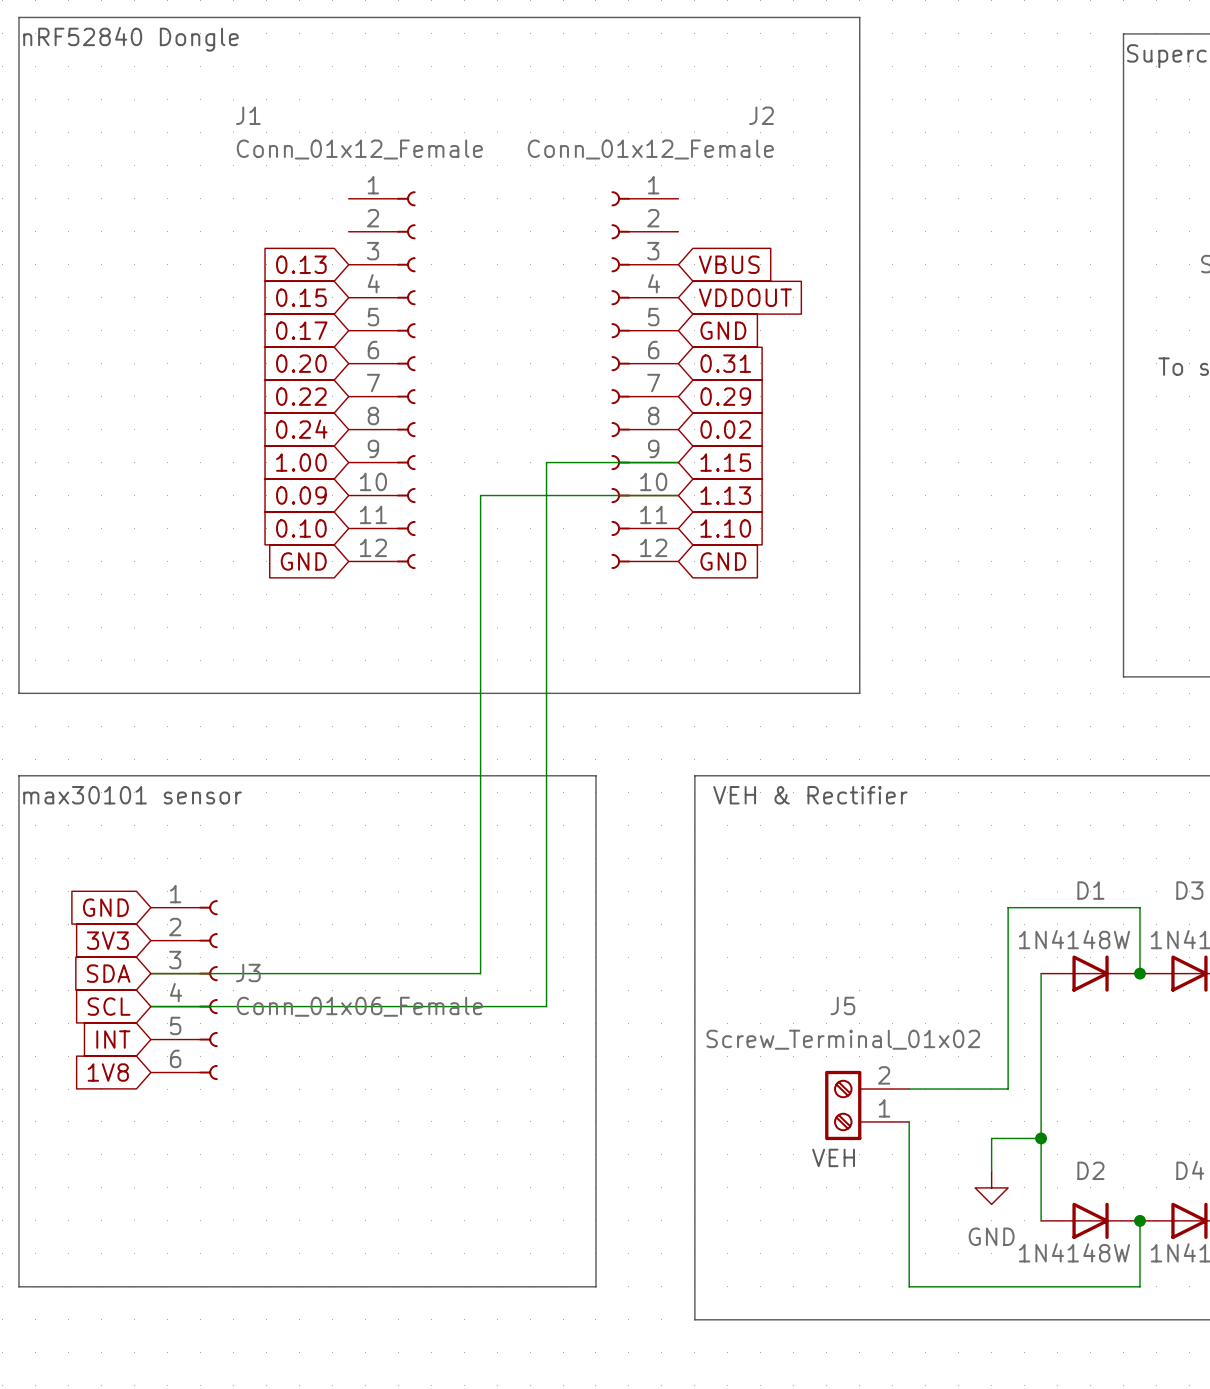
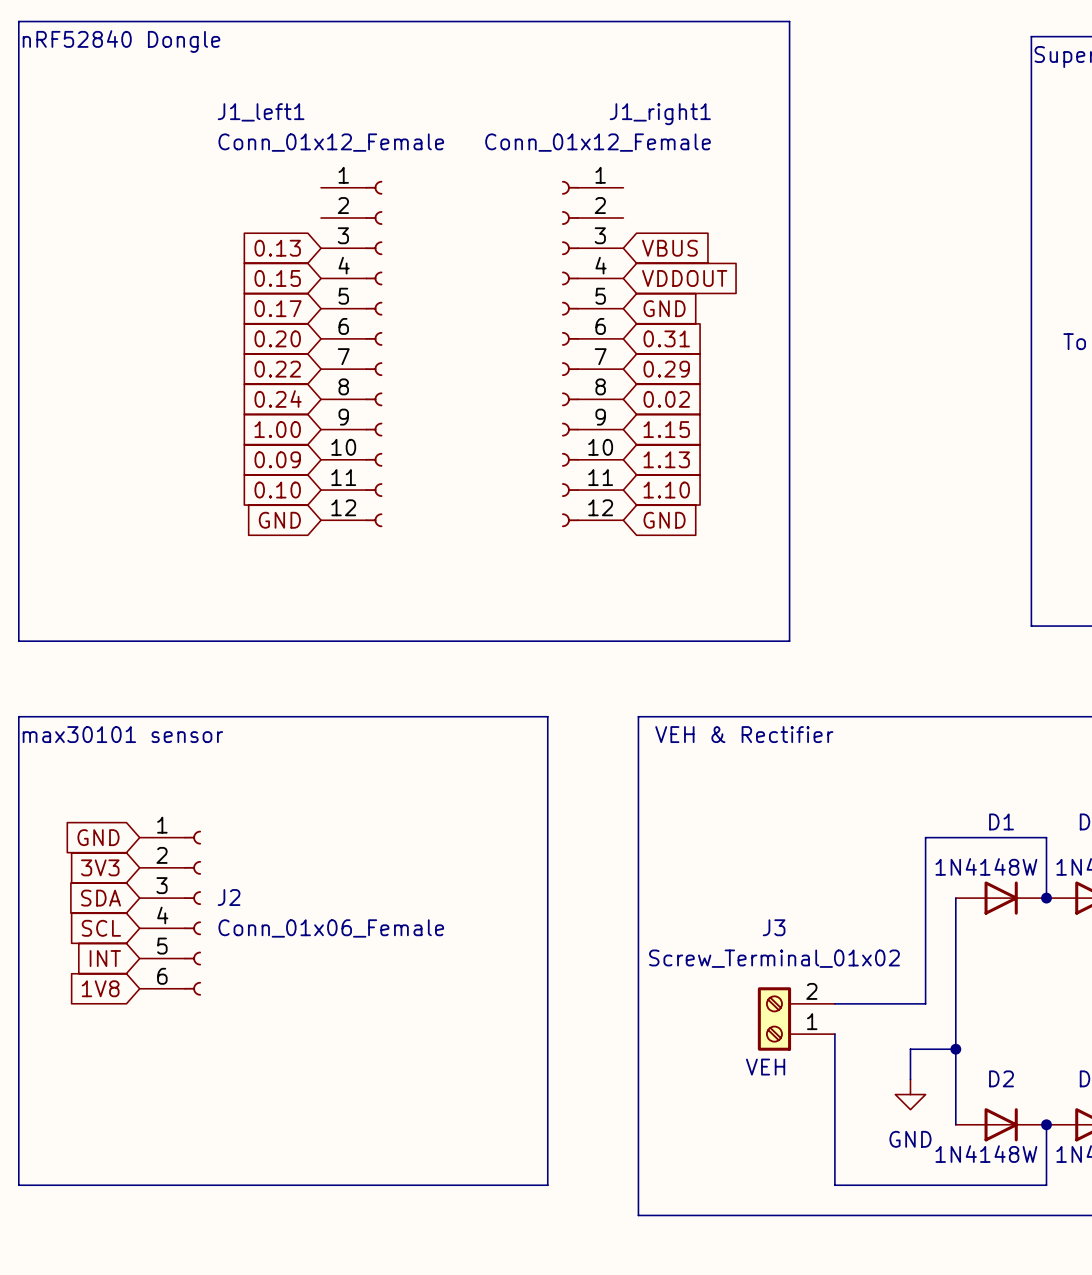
J1 name: J1 (248, 115) -> J1_left1 (261, 112)
J2 name: J2 (761, 115) -> J1_right1 (660, 114)
wire: (678, 462) (546, 462) (546, 1006) (150, 1006) -> none
wire: (678, 495) (480, 495) (480, 973) (150, 973) -> none
J3 name: J3 (248, 972) -> J2 (229, 897)
J5 name: J5 (842, 1005) -> J3 (774, 927)

